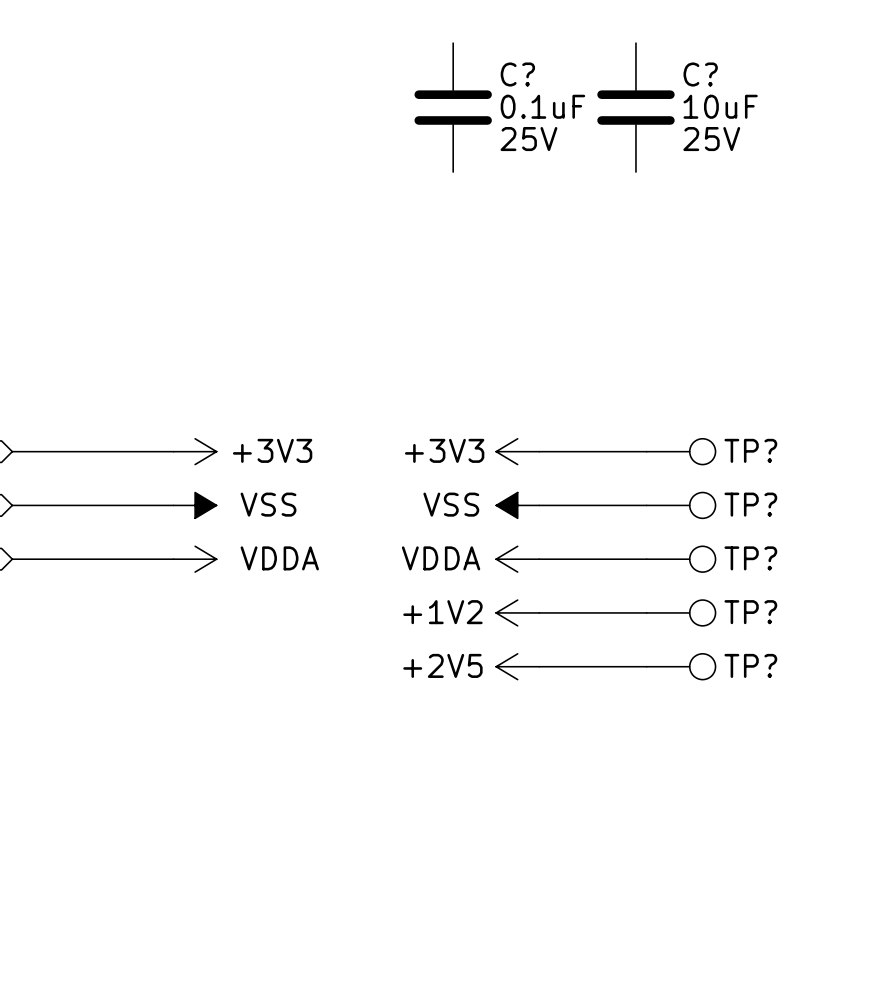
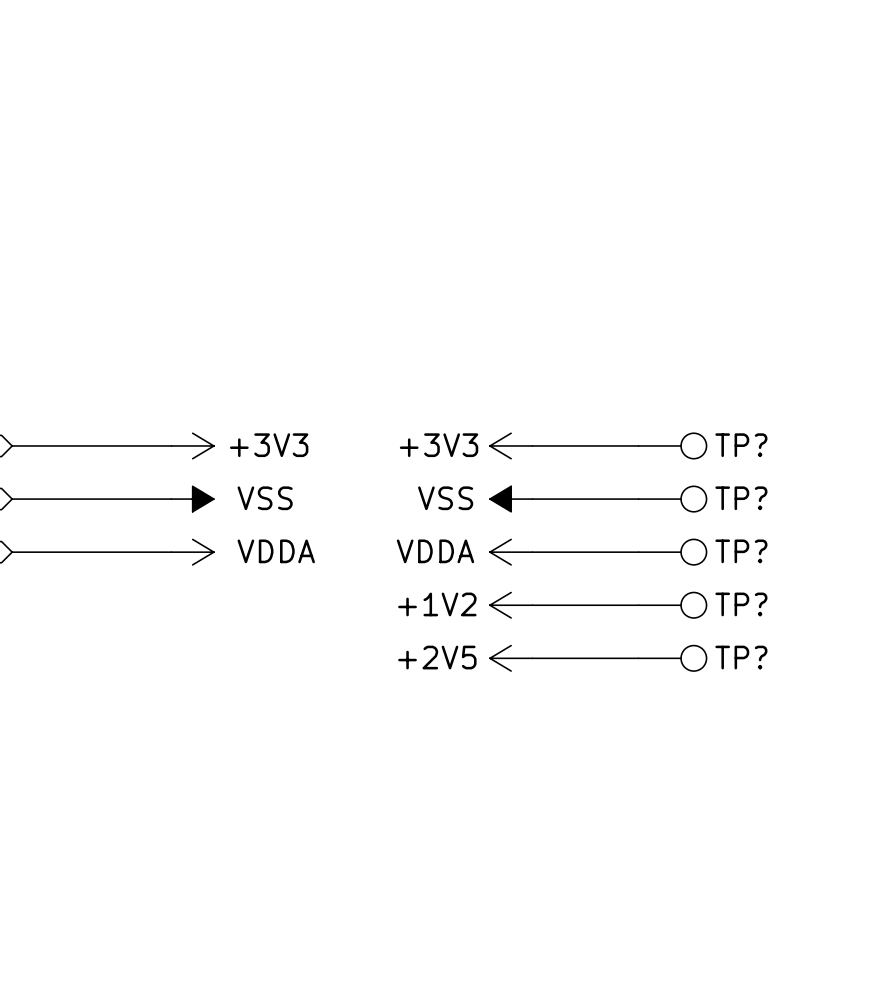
C?: 0.1uF (453, 107) -> none
C?: 10uF (635, 107) -> none

